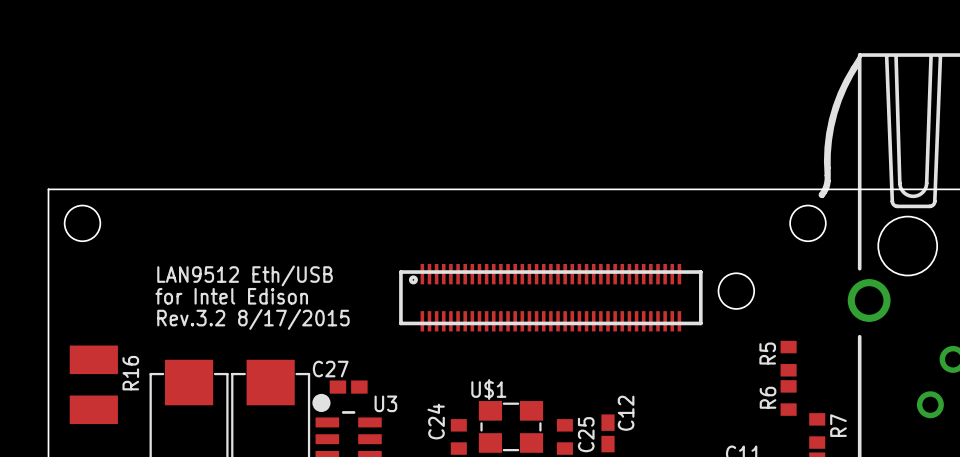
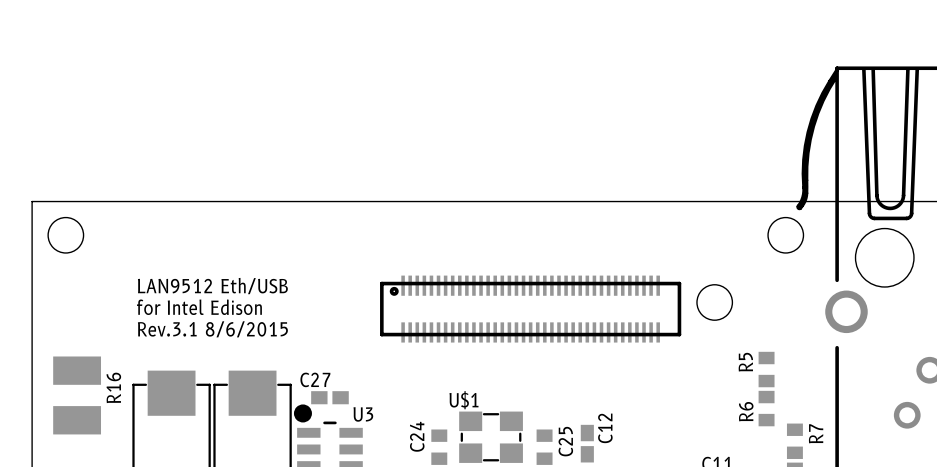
text: Rev.3.2 8/17/2015 (253, 319) -> Rev.3.1 8/6/2015 (212, 329)

